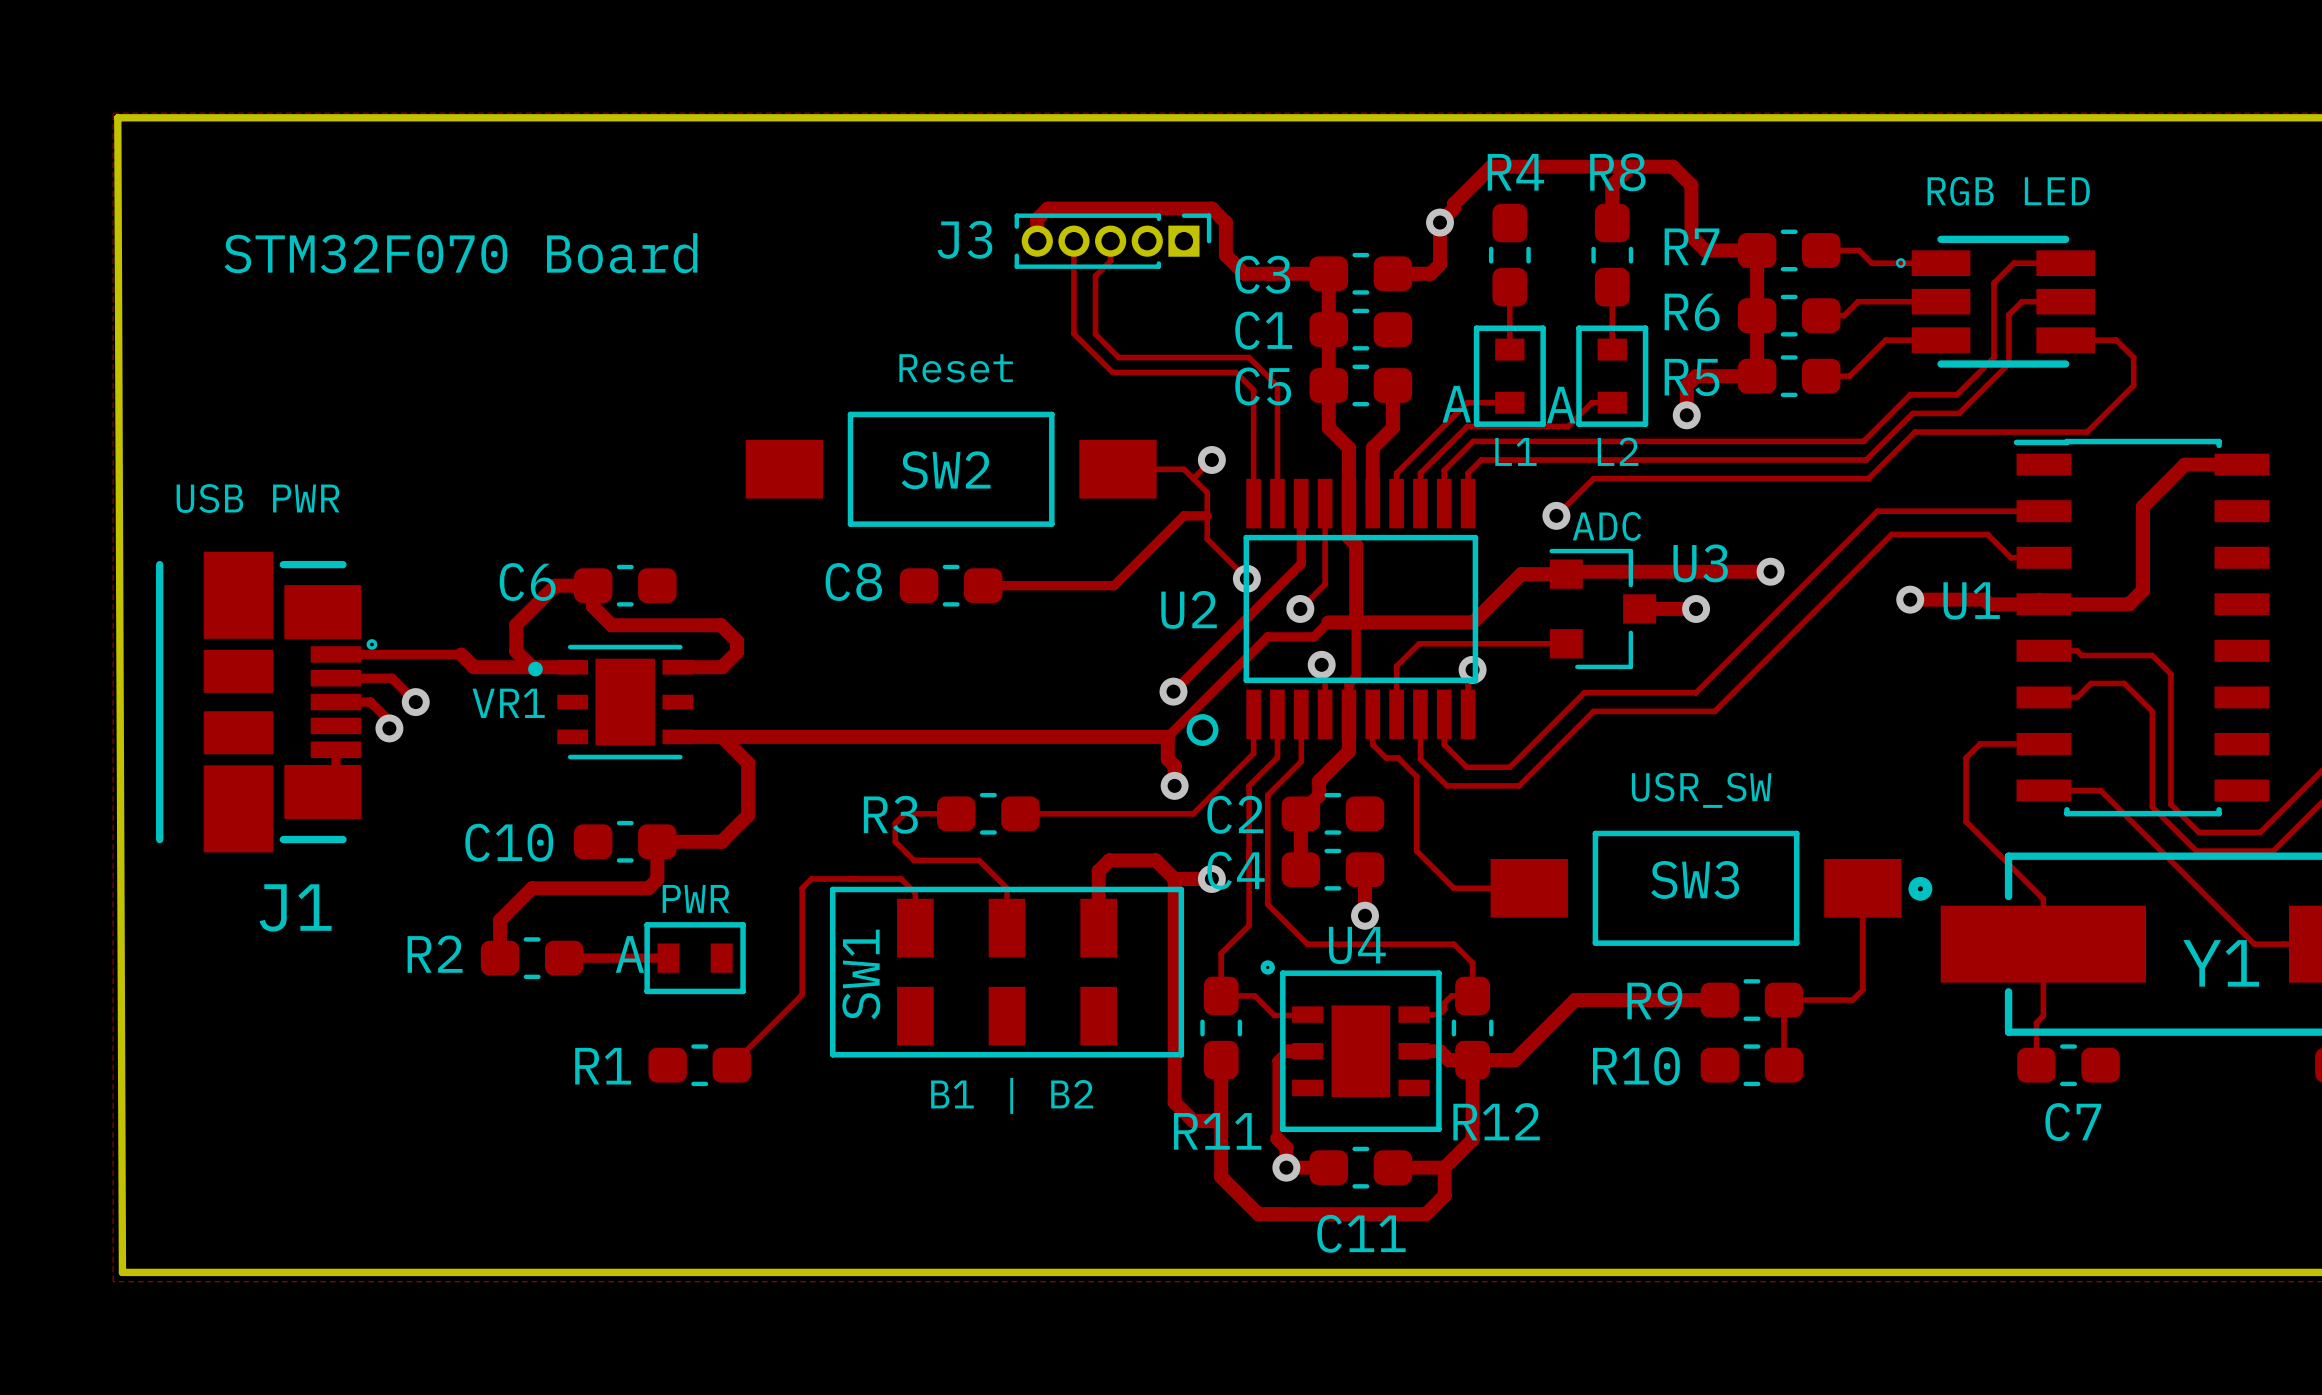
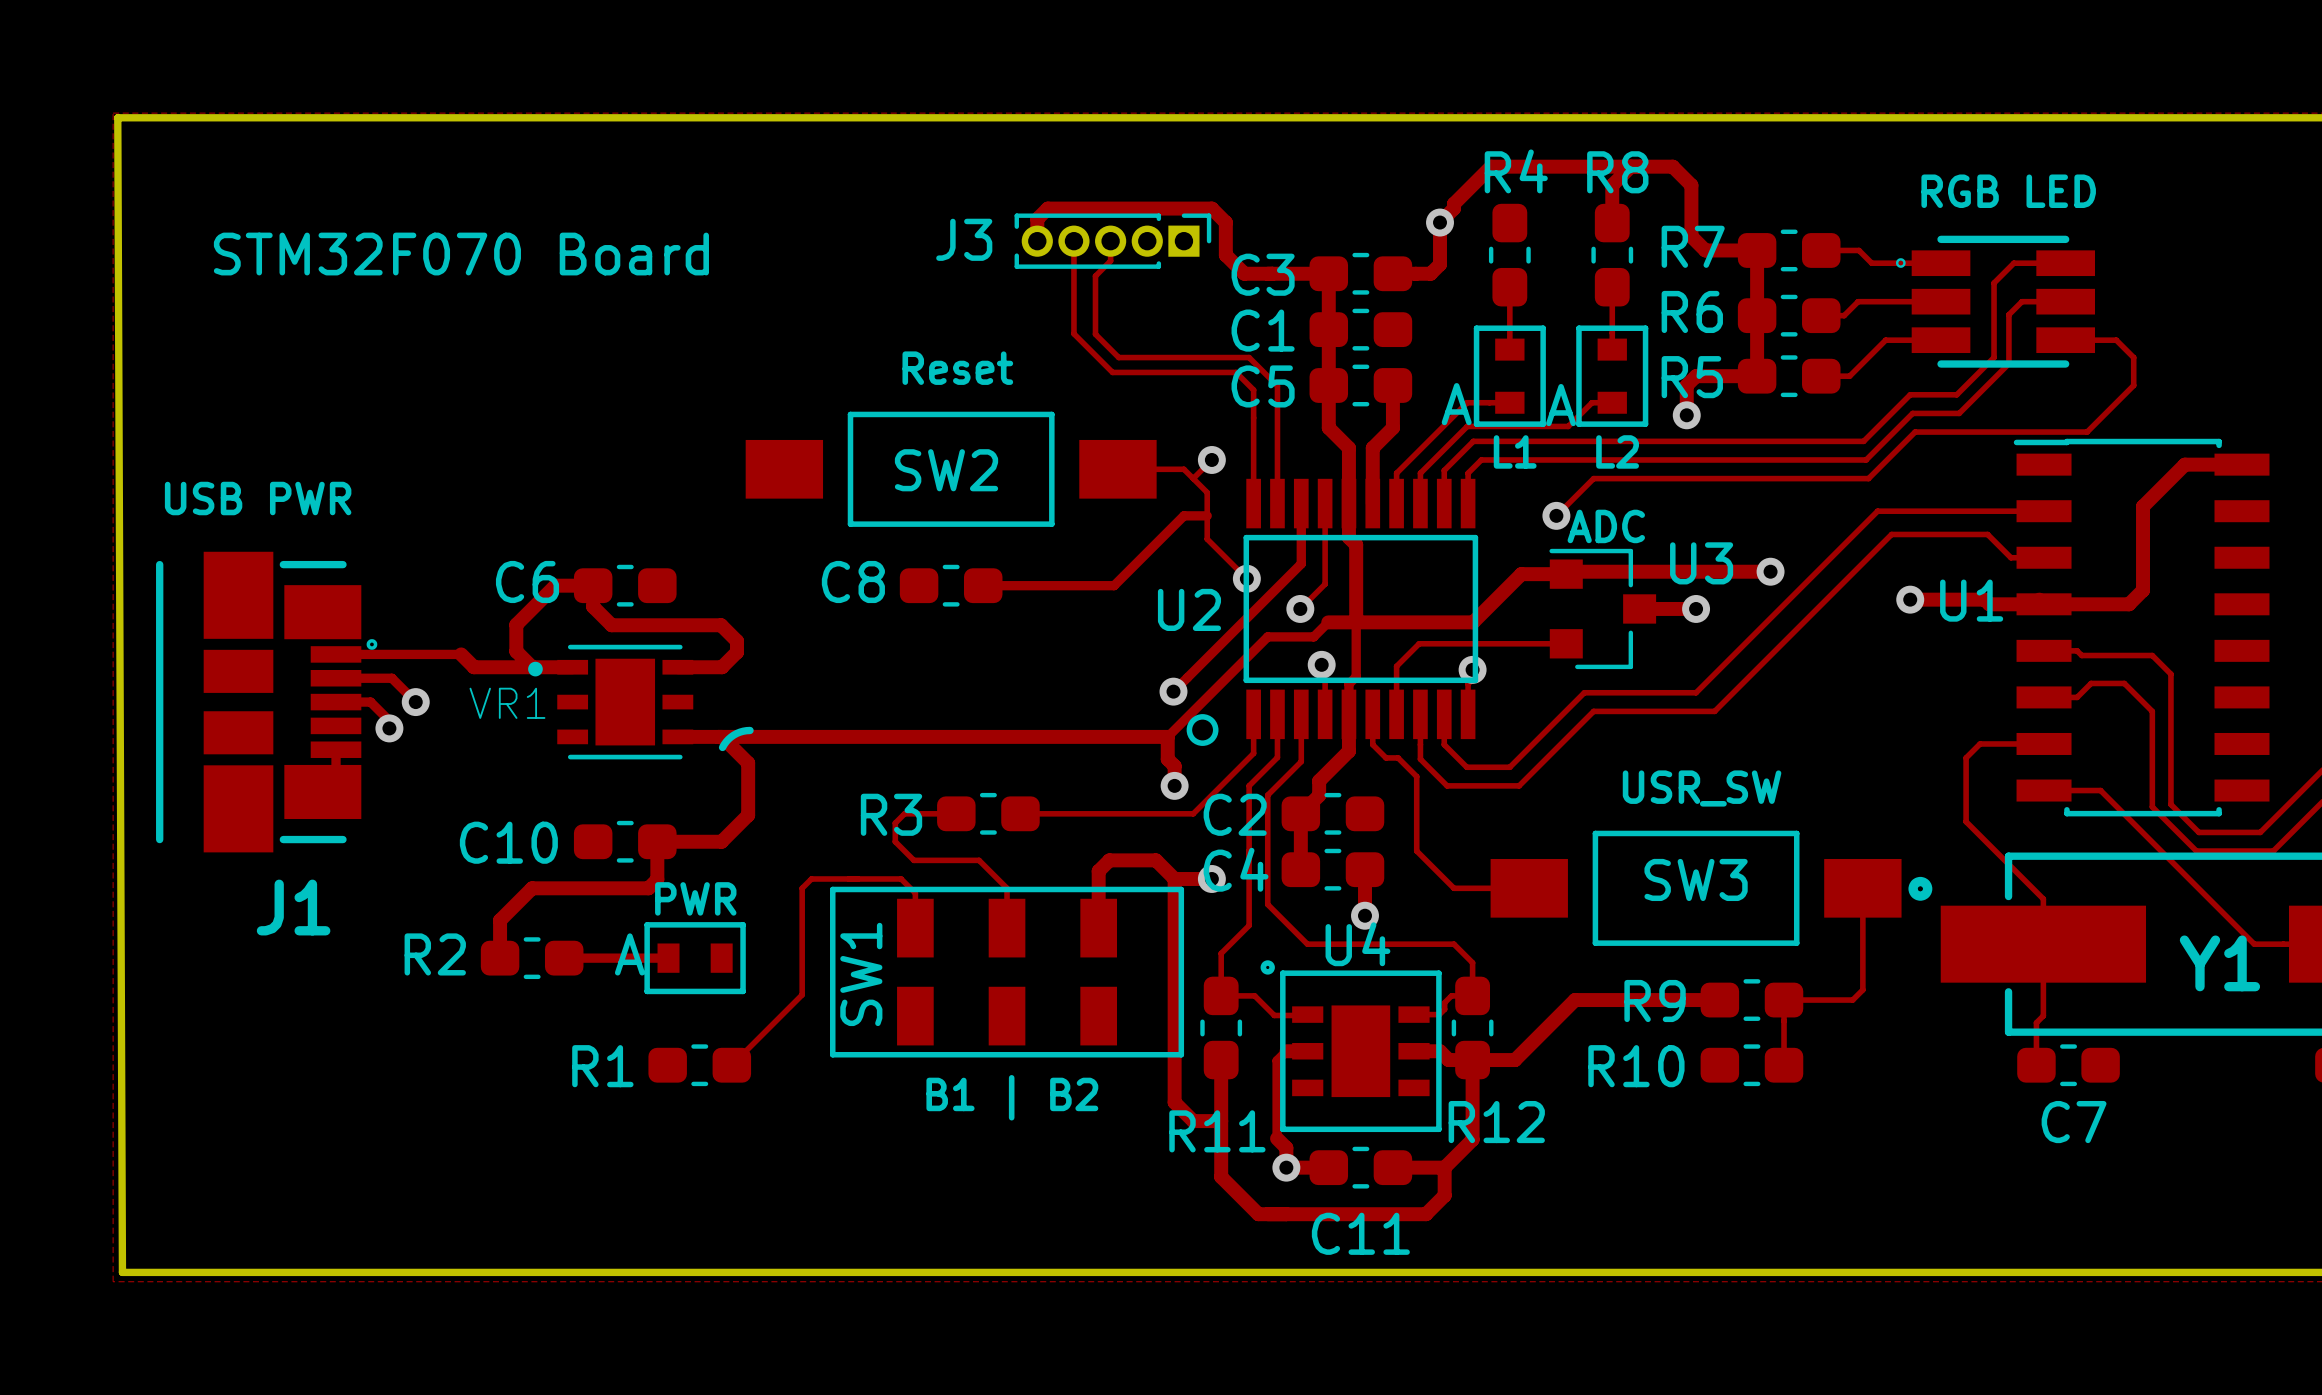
line: none -> (750, 730) (733, 735) (722, 747)

